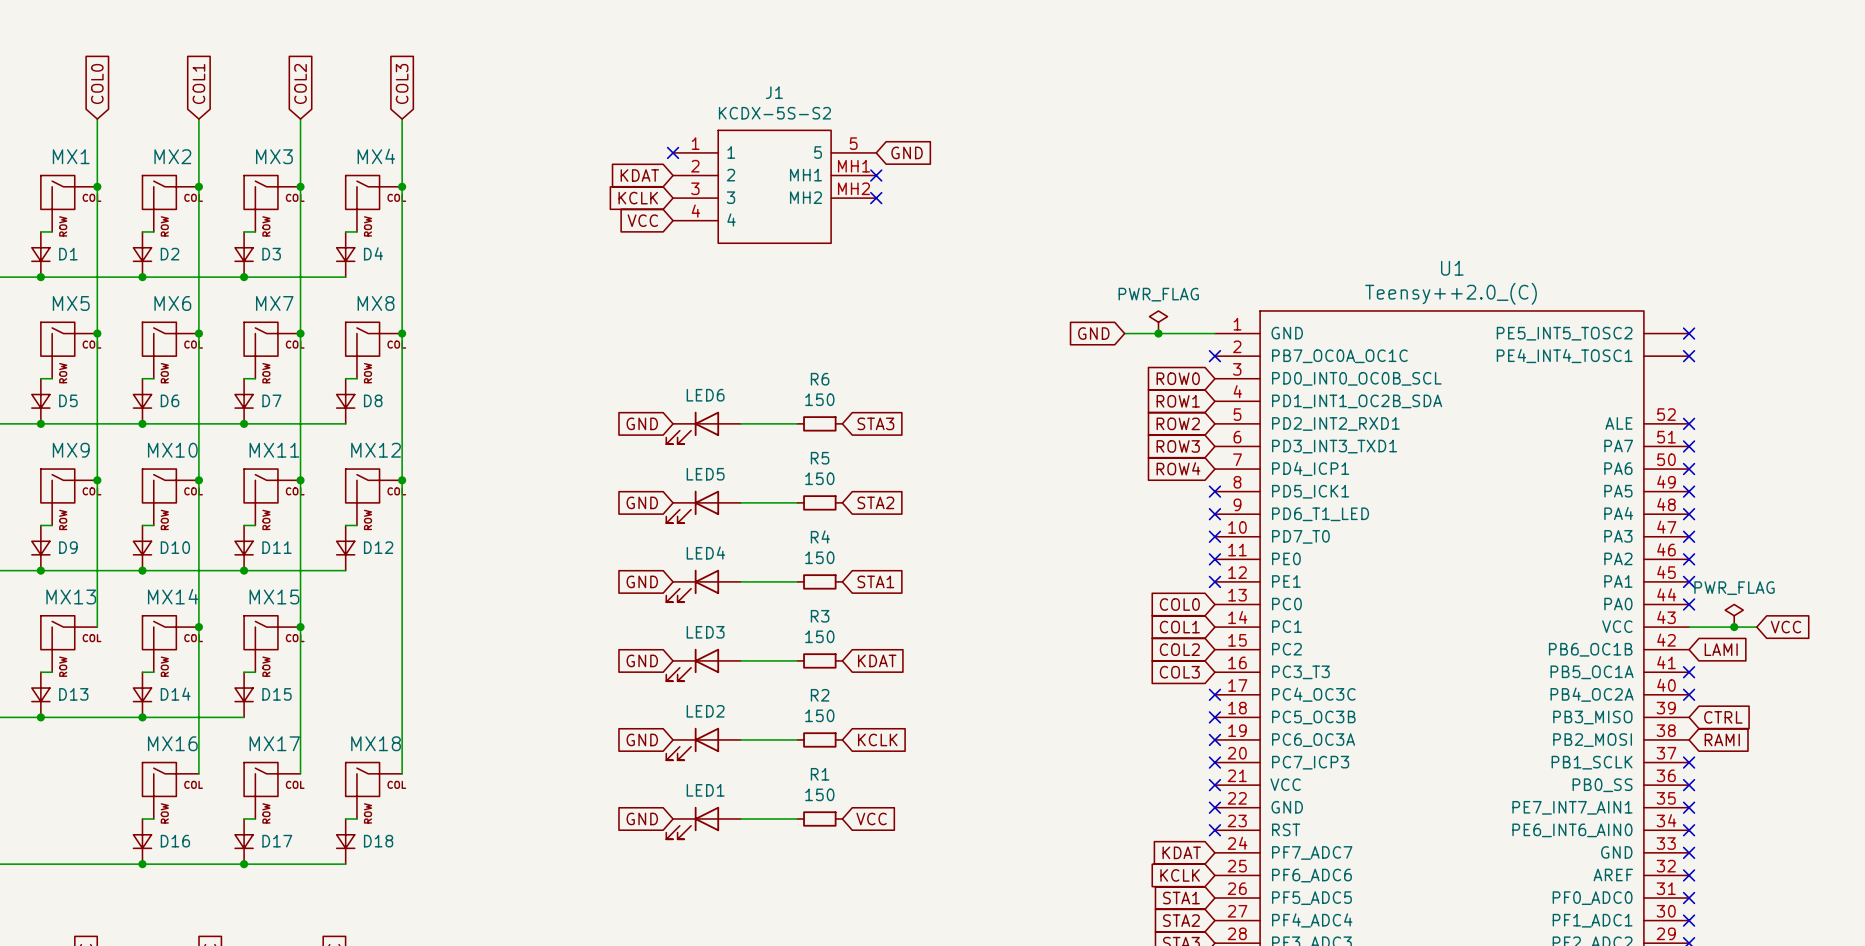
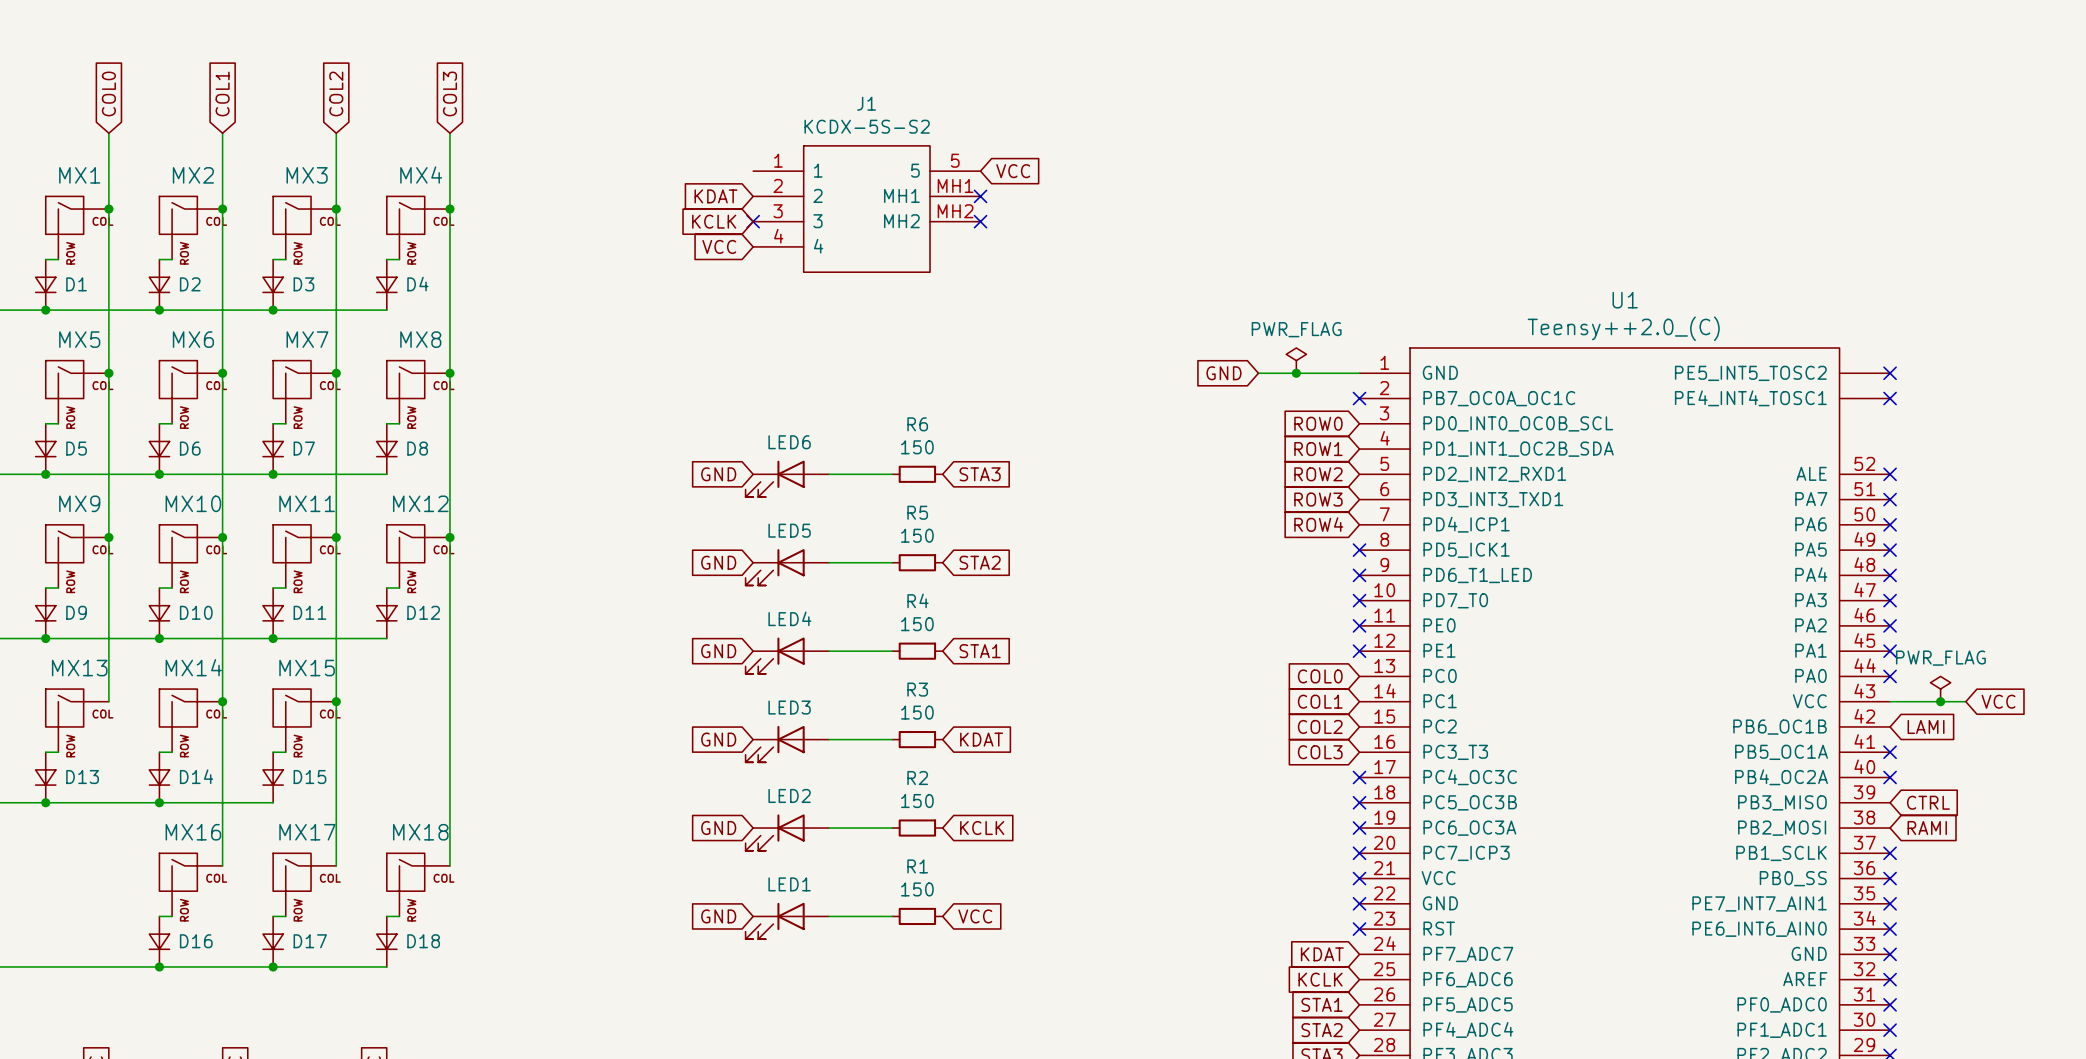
no-connect mark position: (673, 152) -> (753, 221)
global label: GND (907, 152) -> VCC (1013, 171)

